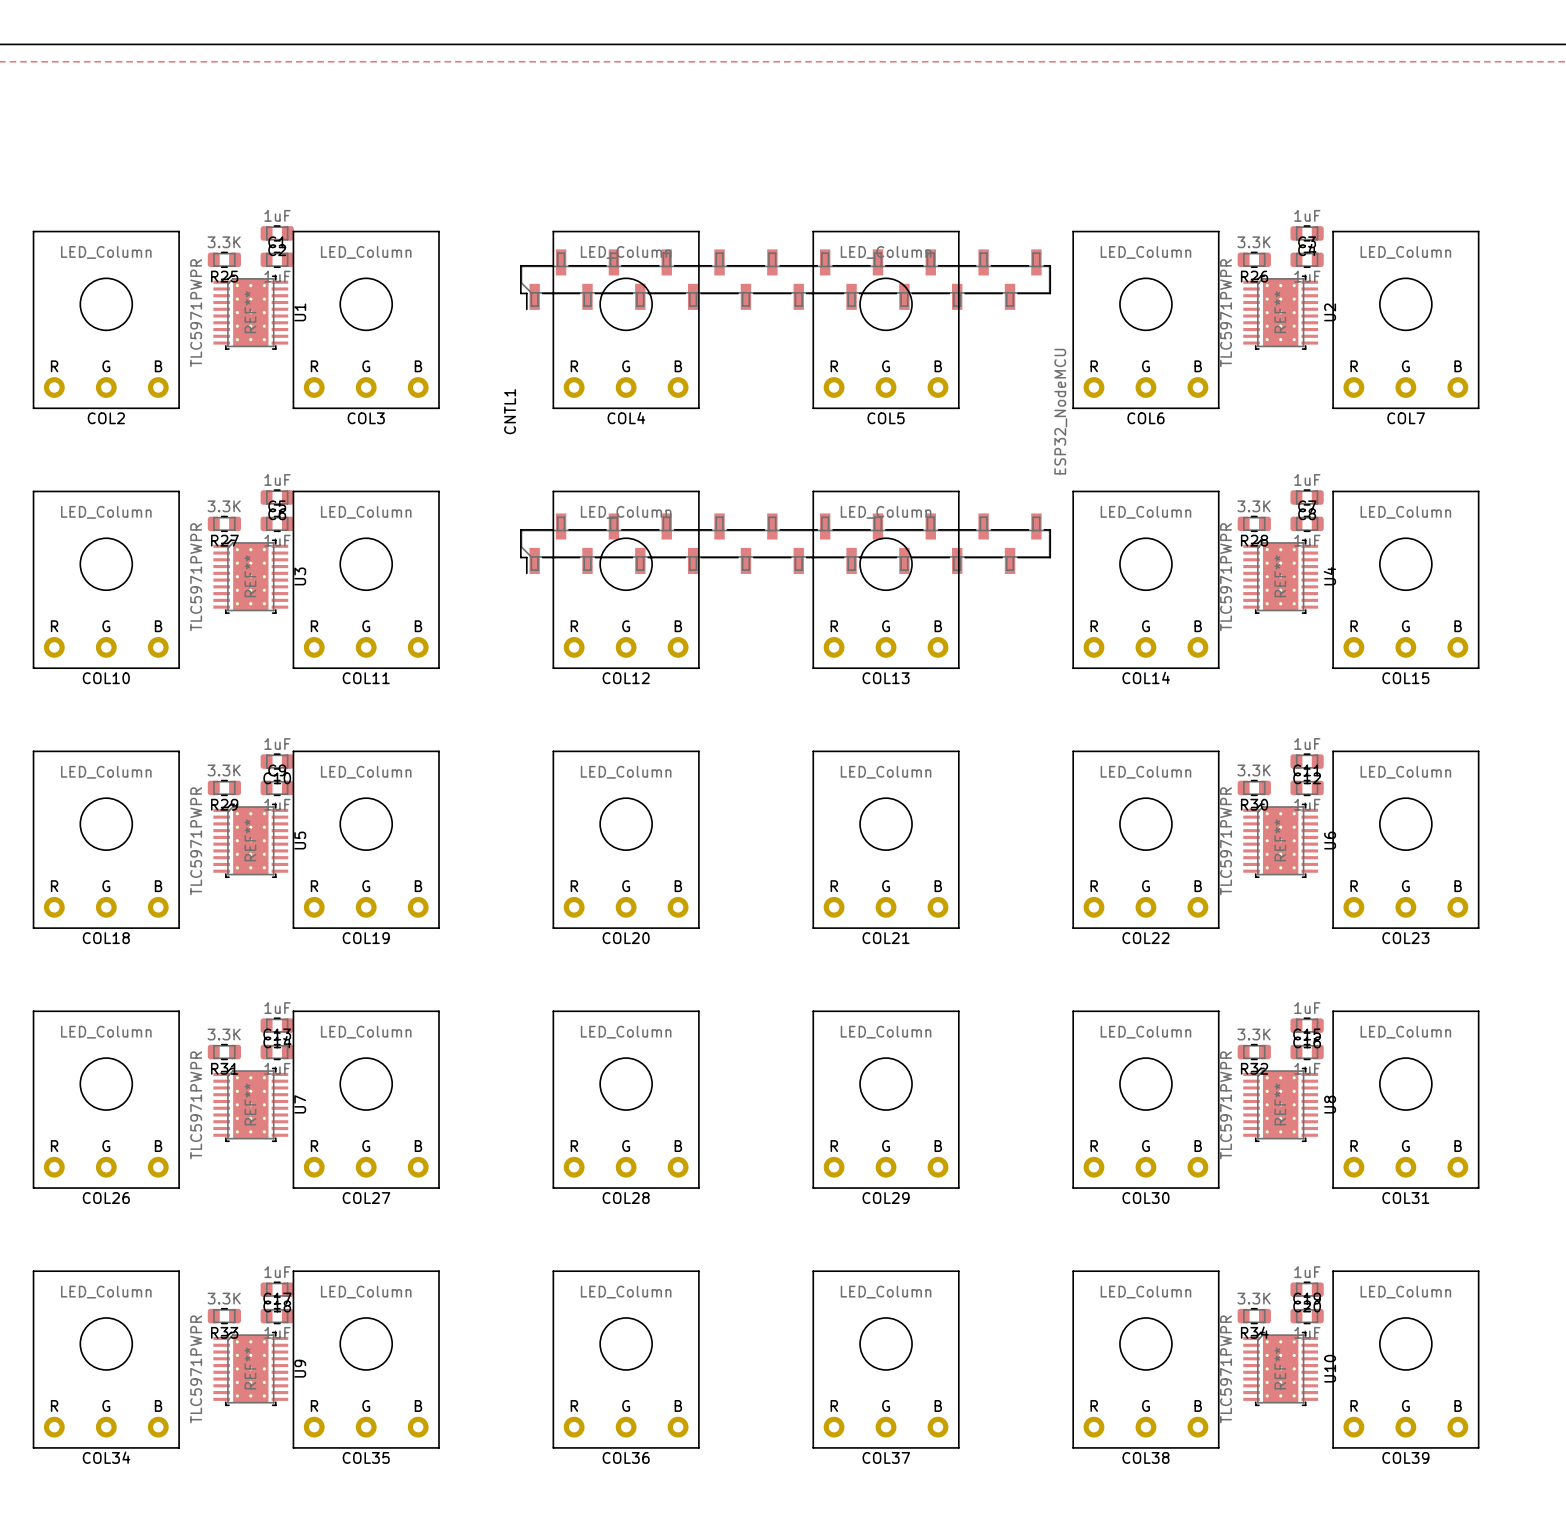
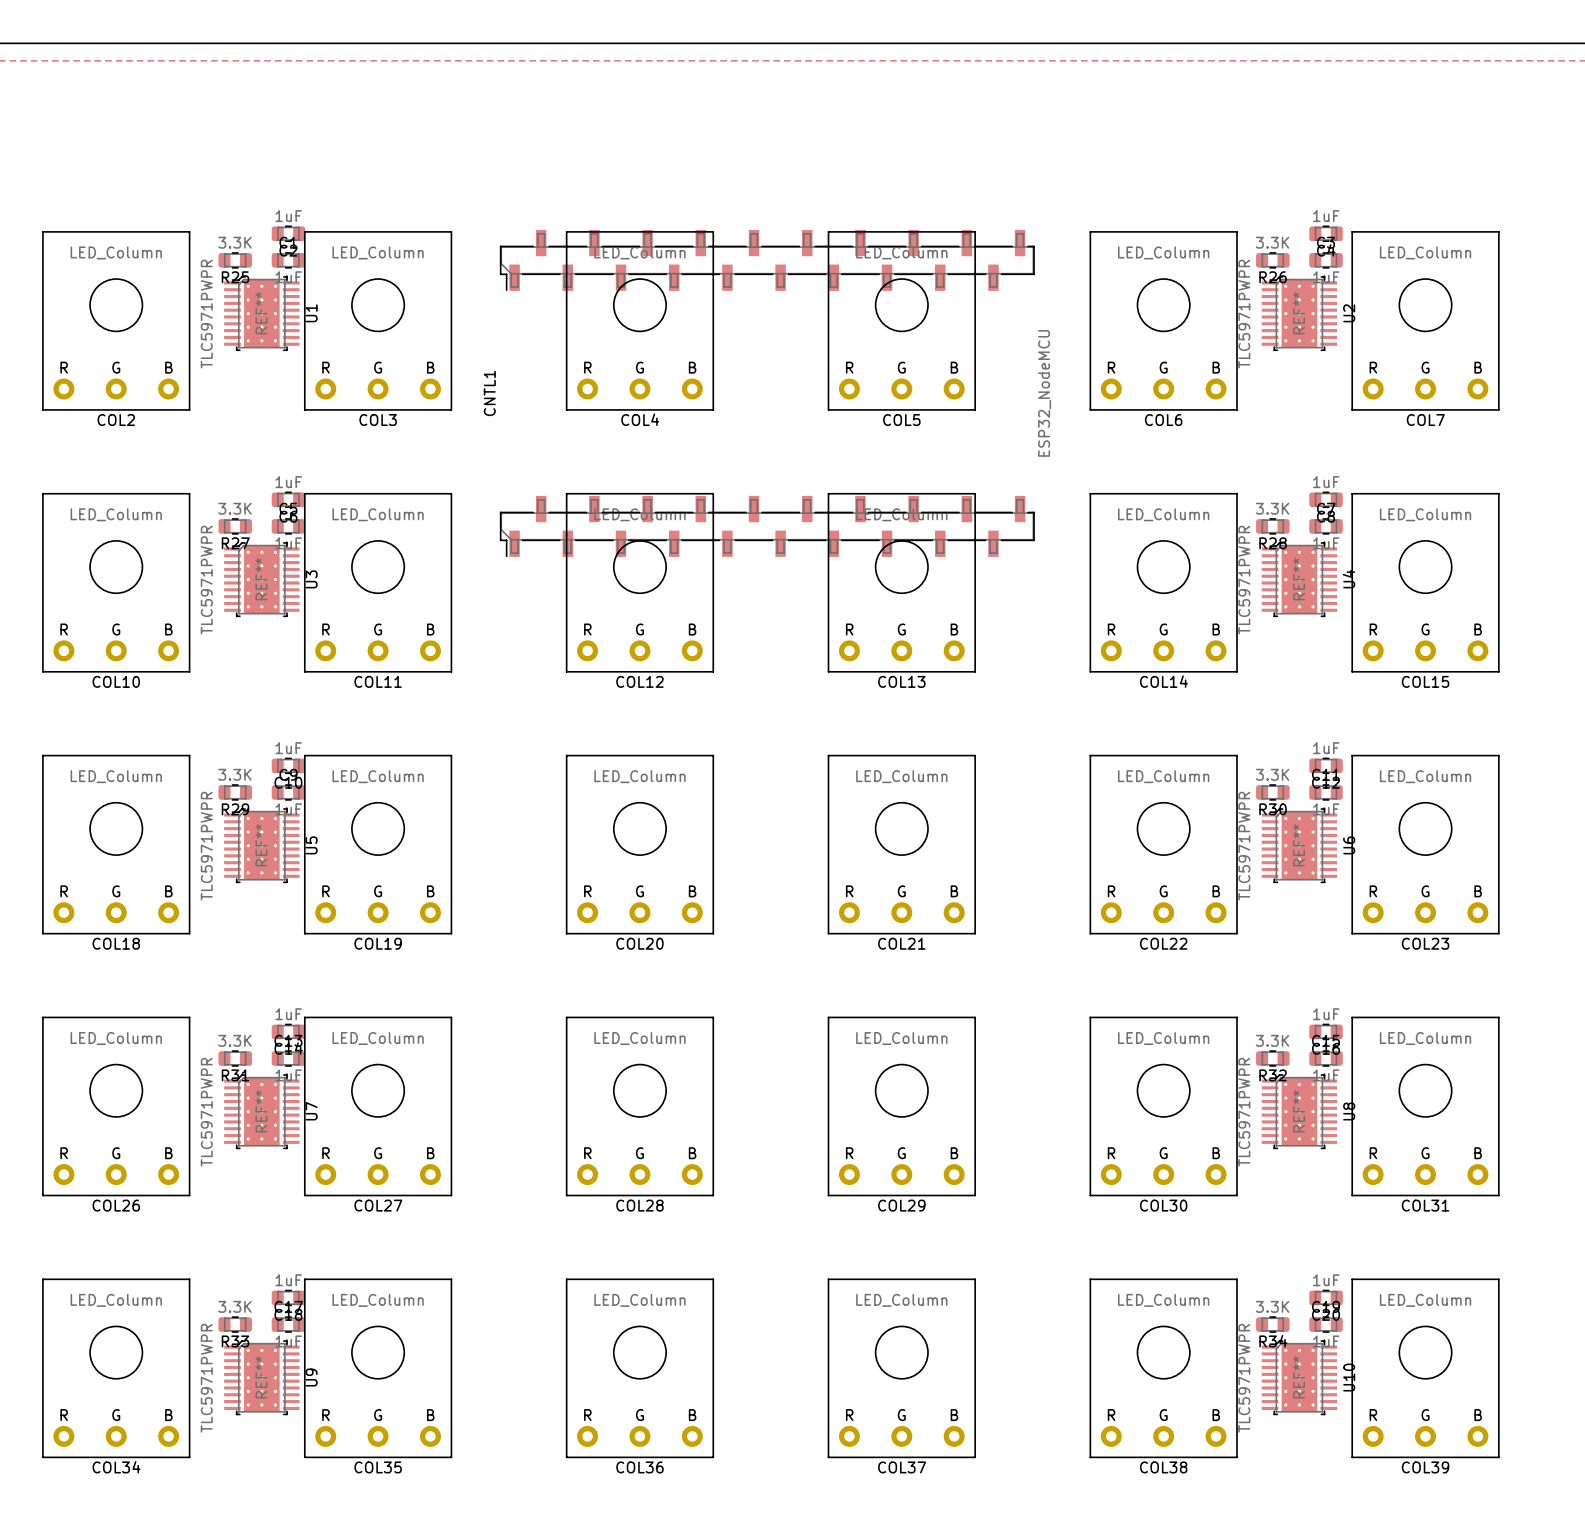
CNTL1 position: (785, 411) -> (767, 393)

